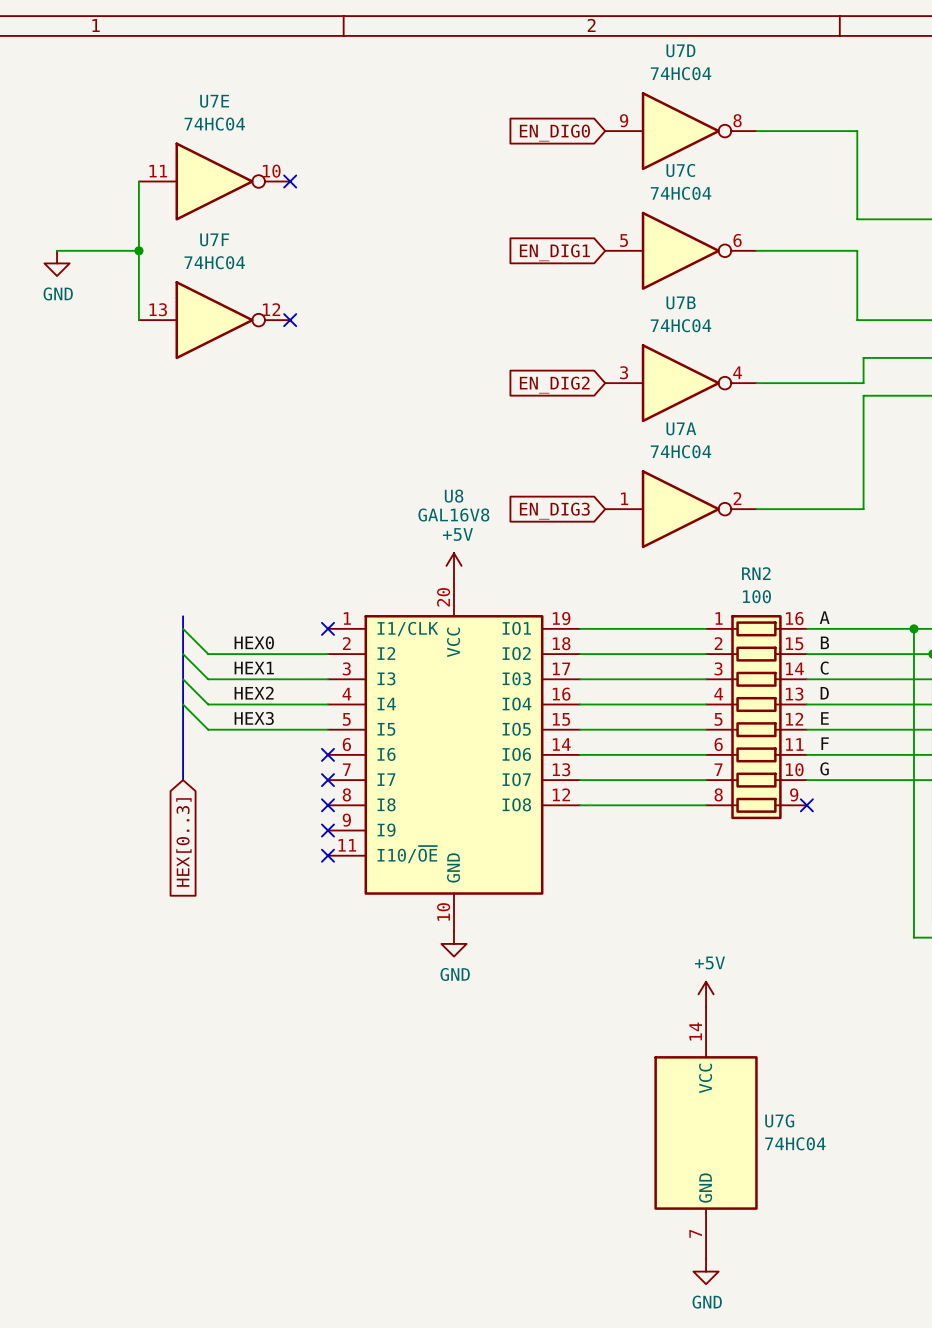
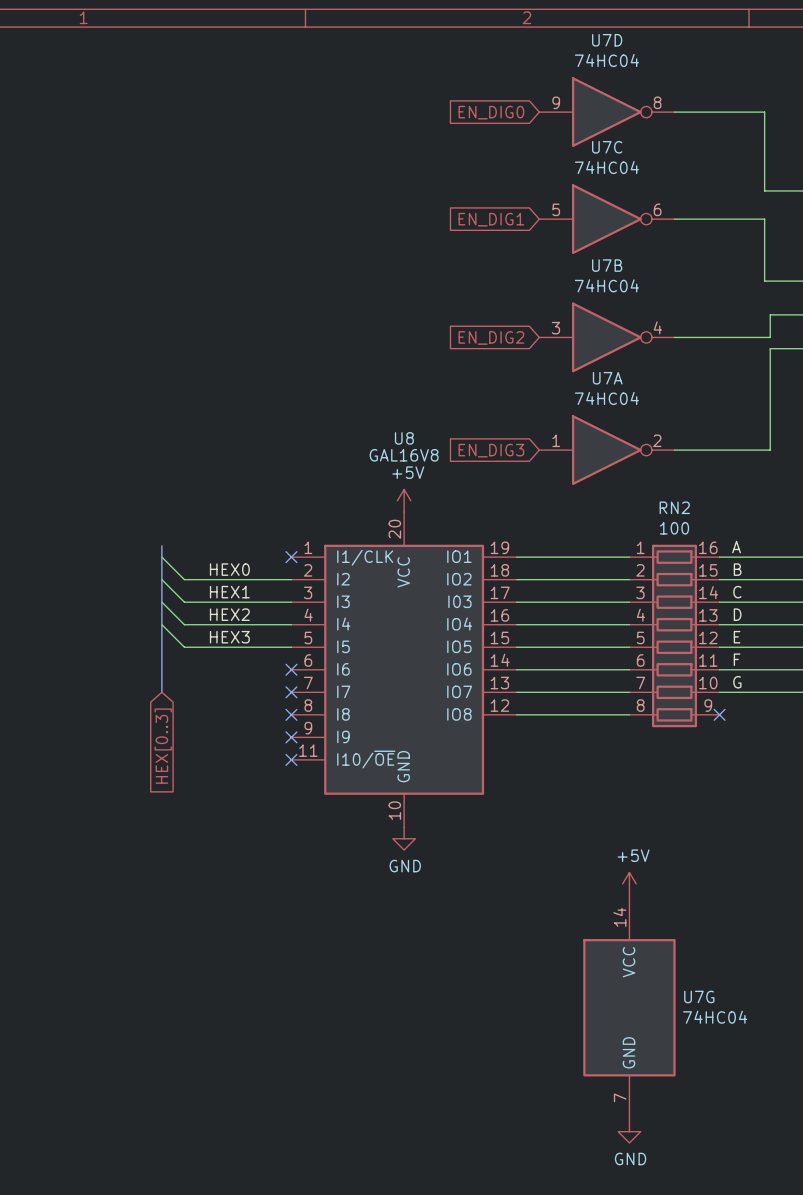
wire: (138, 181) (138, 320) -> none
U7E: 74HC04 (214, 181) -> none
no-connect mark: (290, 181) -> none
wire: (57, 250) (138, 250) -> none
junction: (138, 250) -> none
power symbol: GND (57, 263) -> none
U7F: 74HC04 (214, 320) -> none
no-connect mark: (290, 320) -> none

